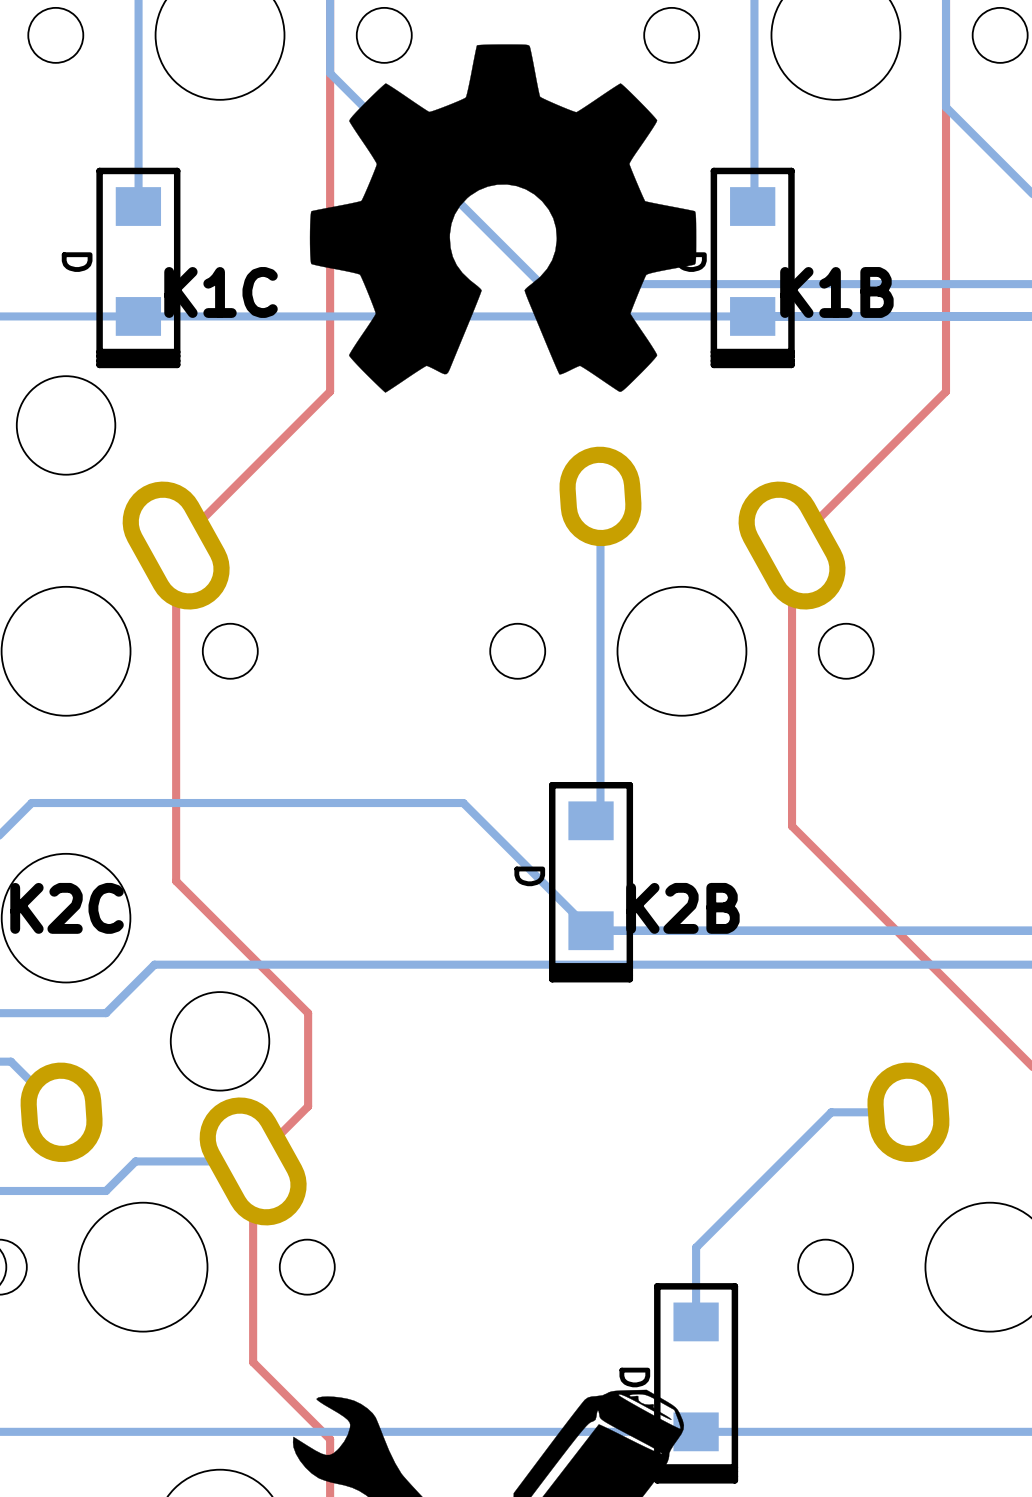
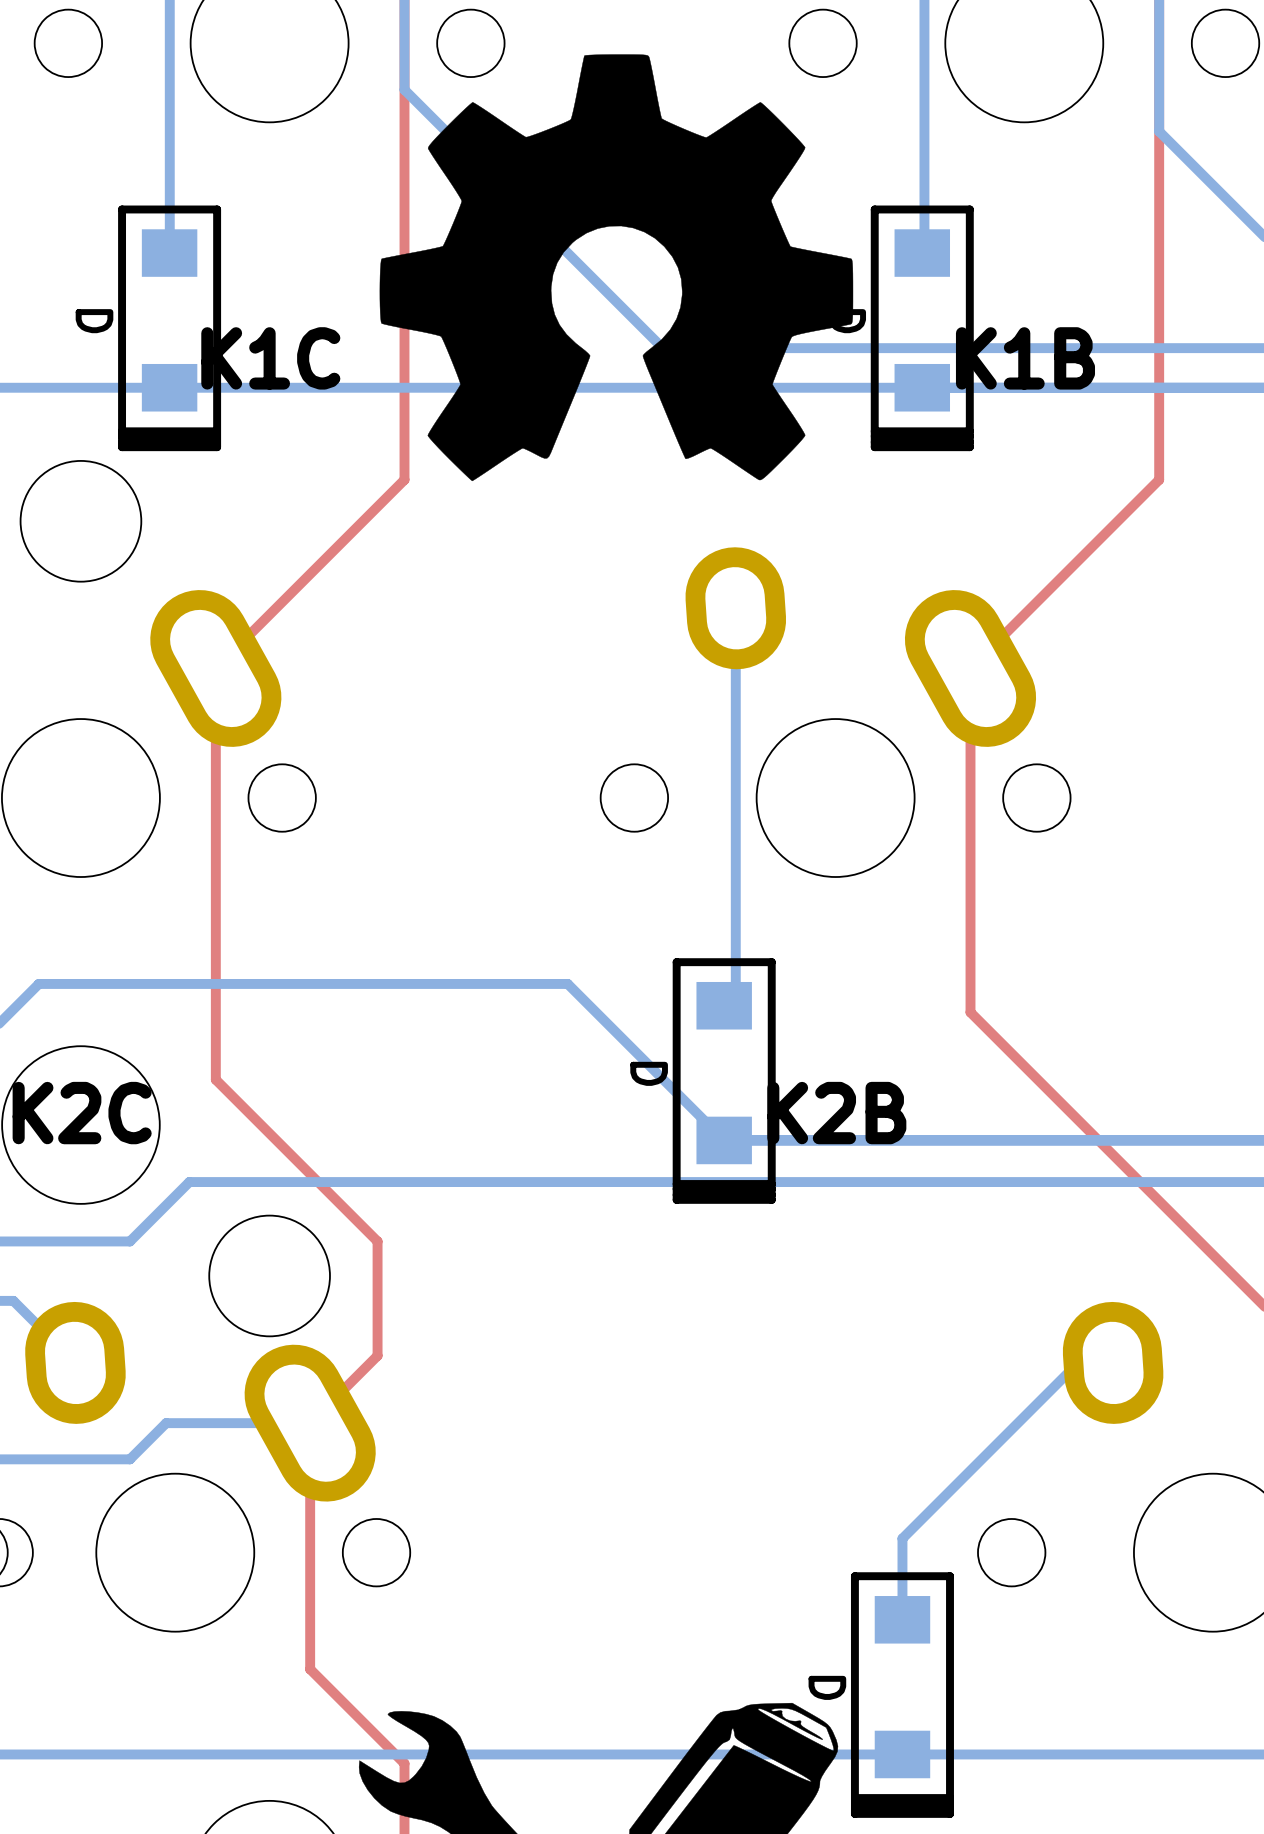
bottom track: (879, 1112) (831, 1112) (696, 1247) (696, 1321) -> (1078, 1362) (902, 1538) (902, 1619)
part position: (696, 1383) -> (902, 1695)

